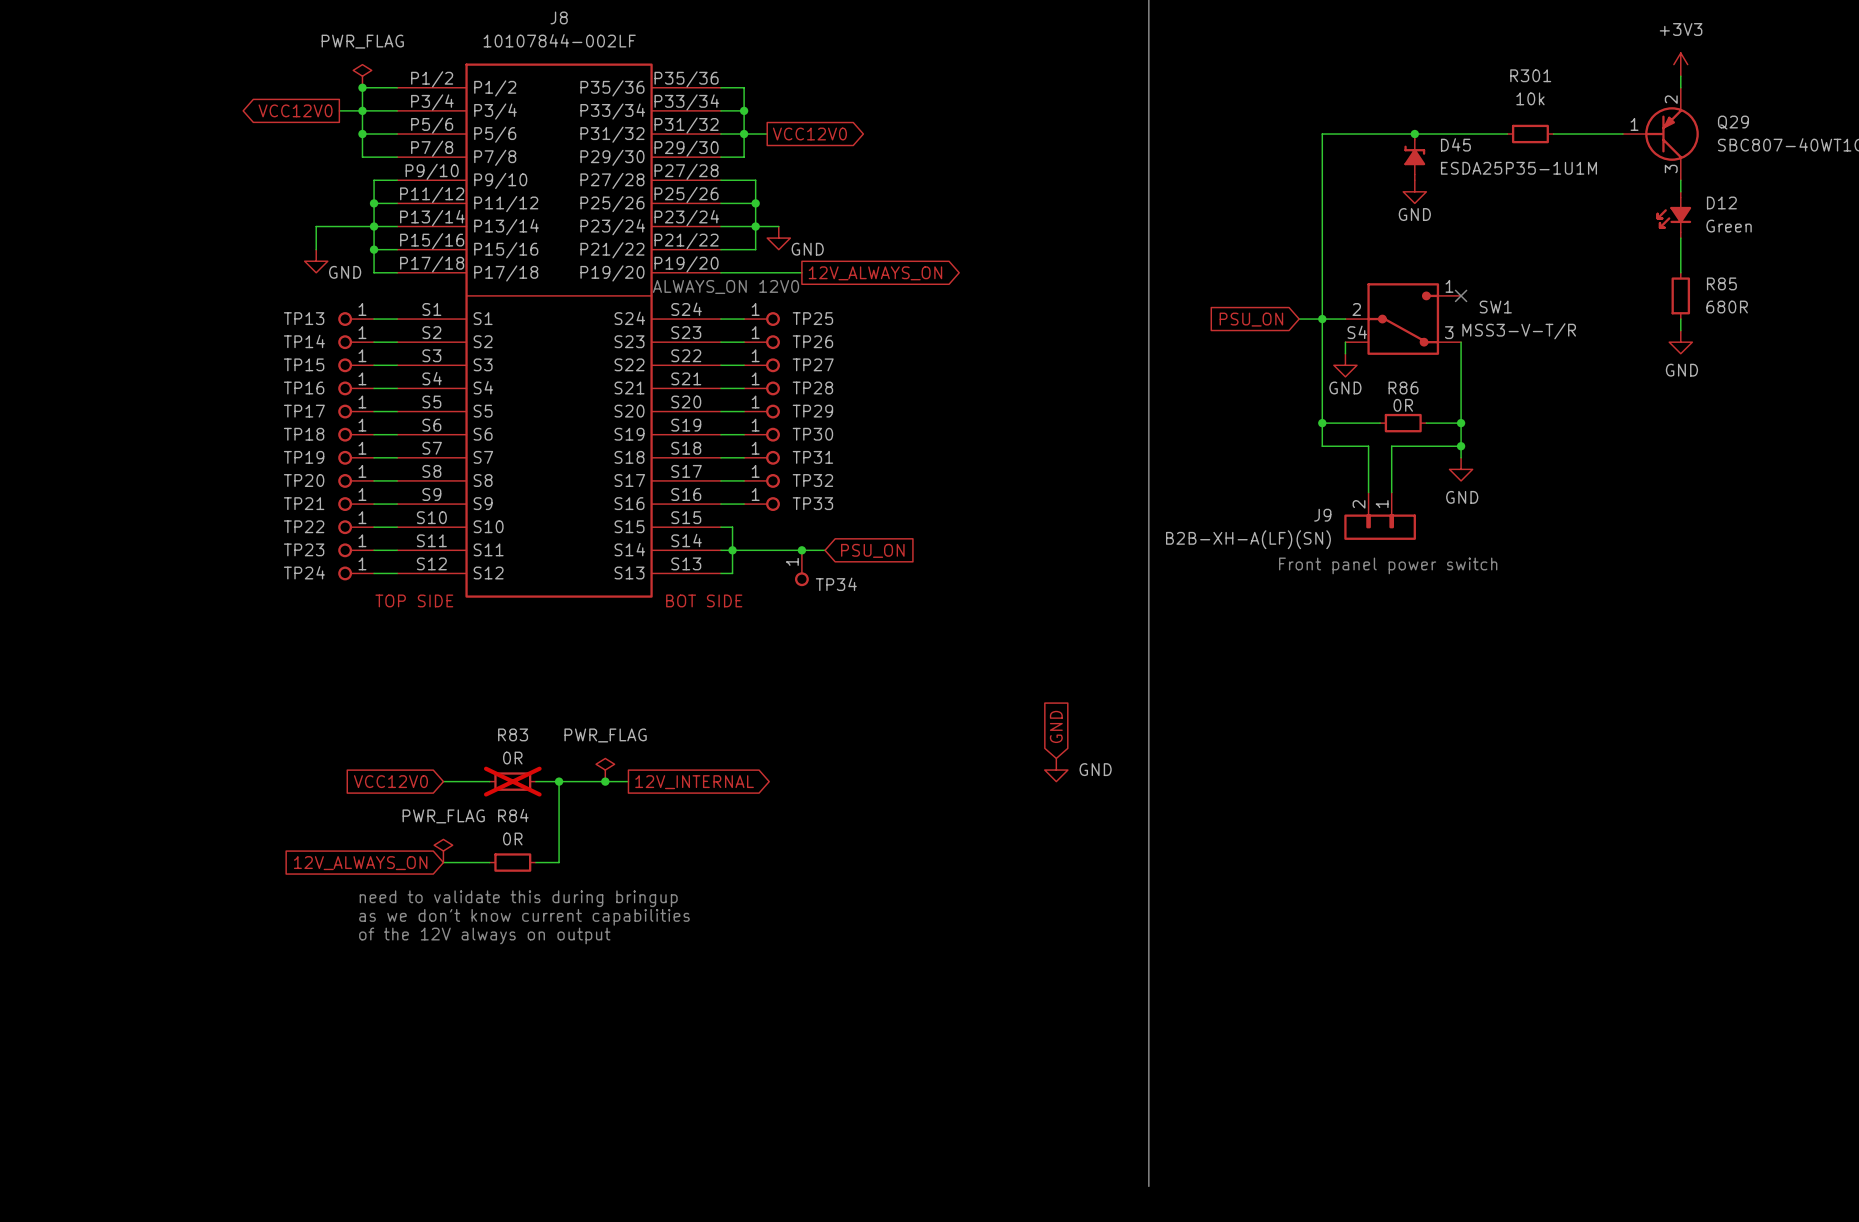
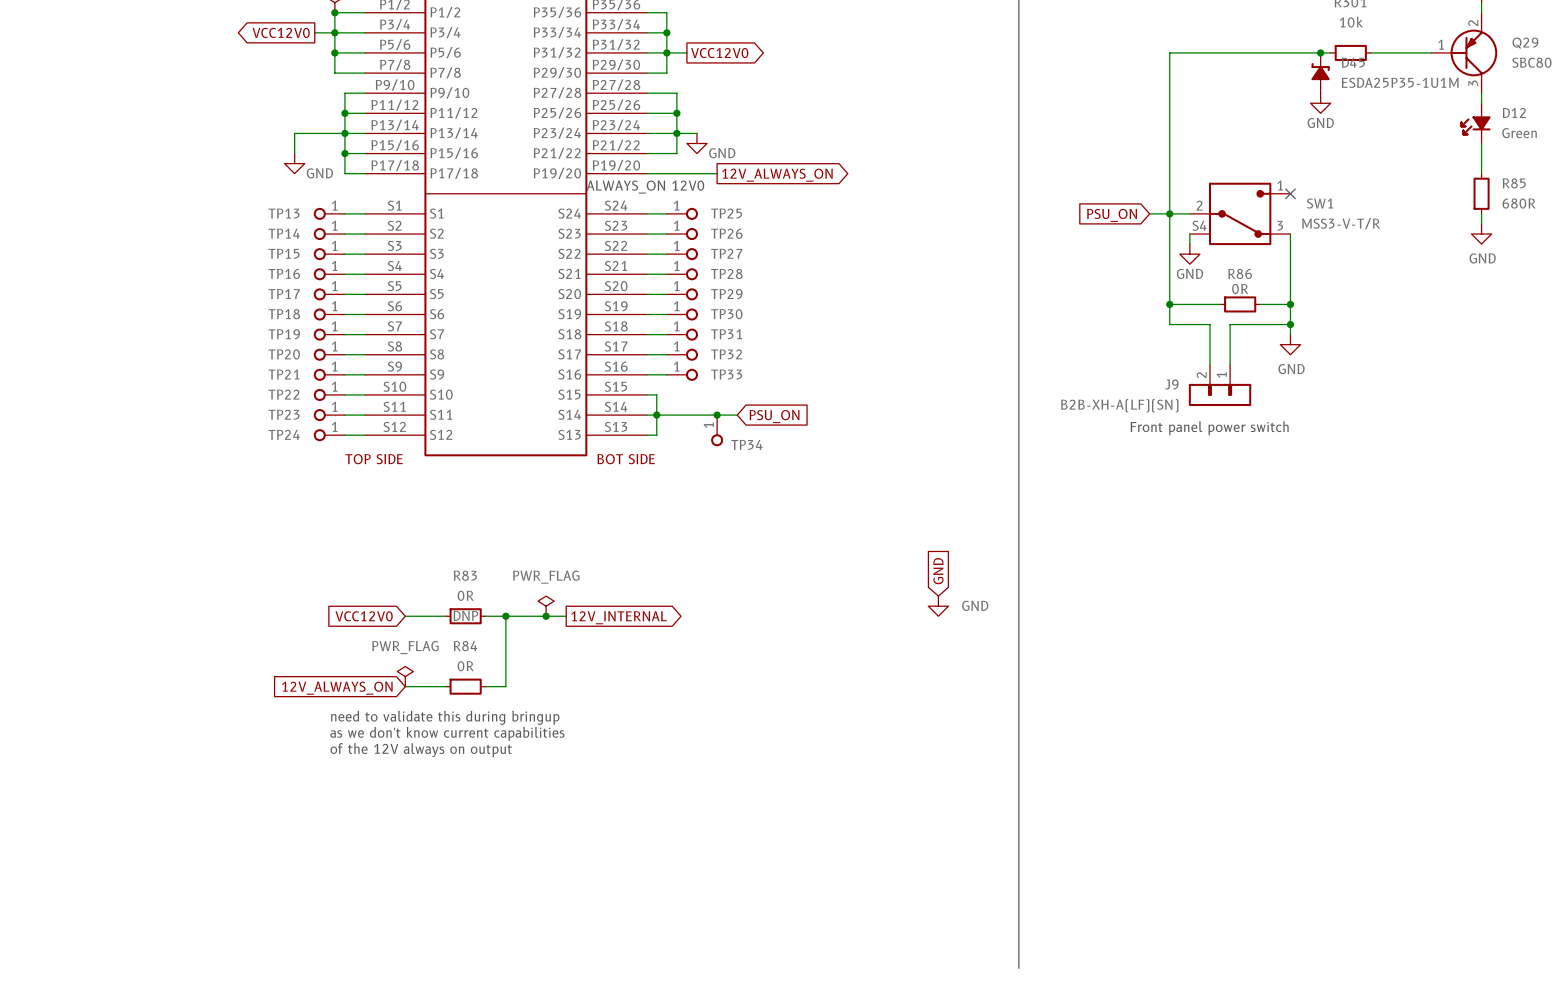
junction: (1414, 134) -> none
junction: none -> (1320, 52)
D45 position: (1414, 157) -> (1320, 73)
power symbol position: GND (1414, 191) -> GND (1320, 103)
R83 do-not-place cross: (512, 781) -> none
R83 text: none -> DNP (465, 615)

